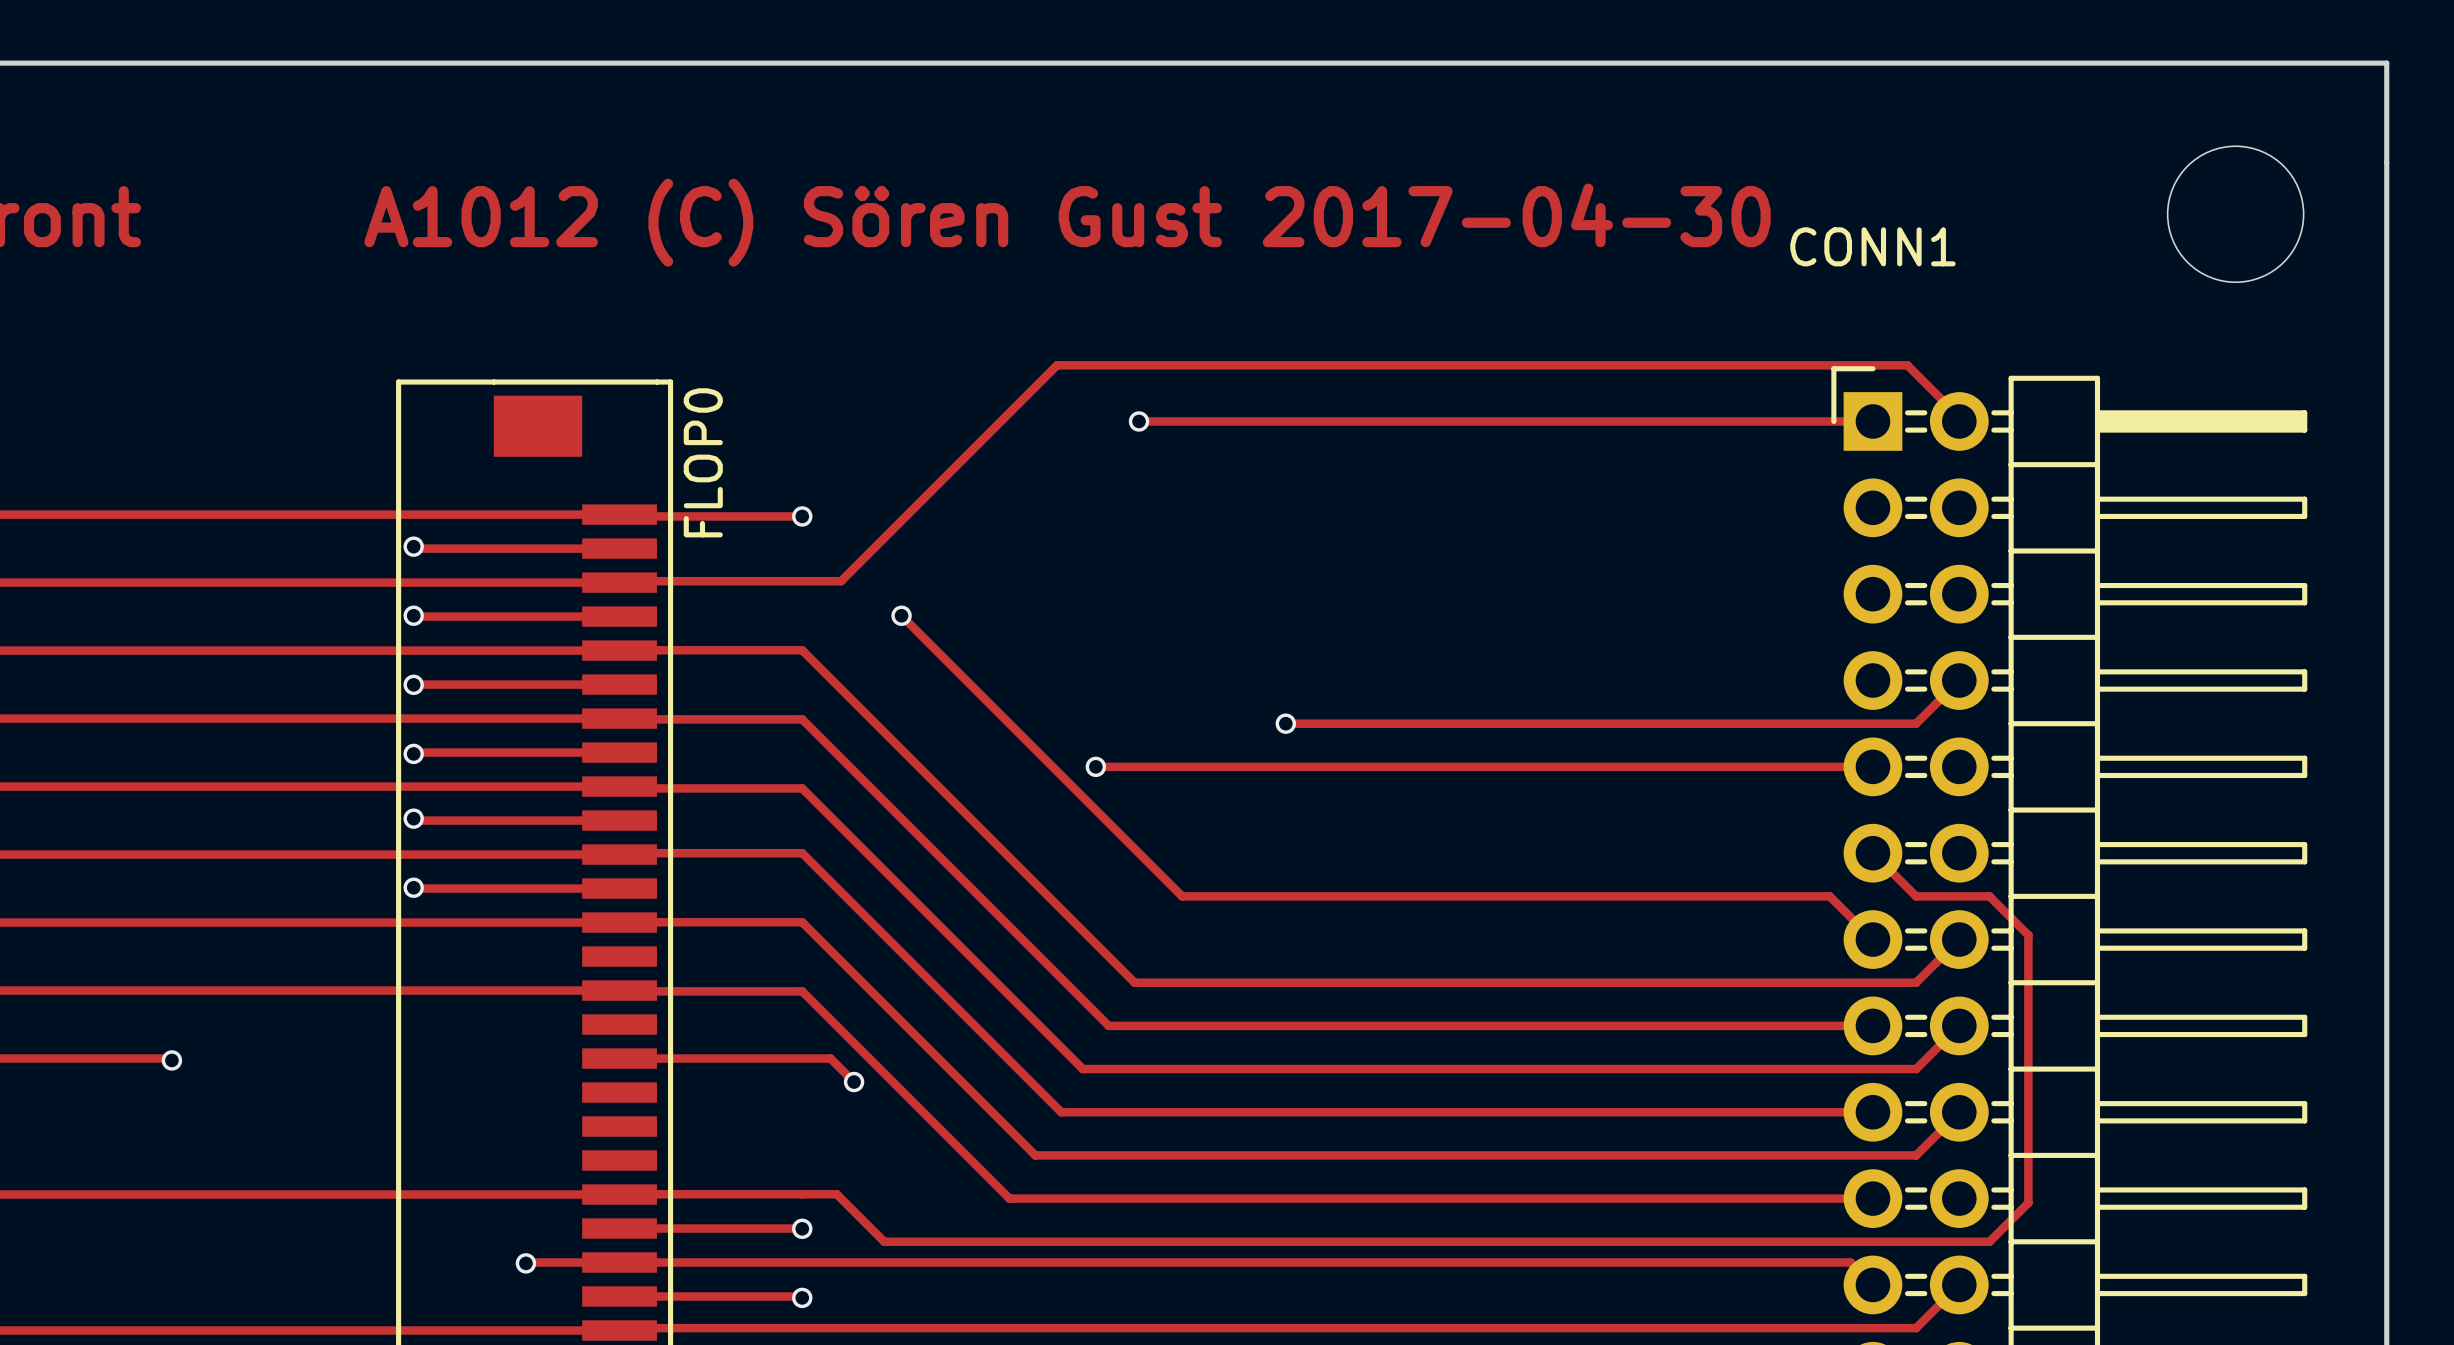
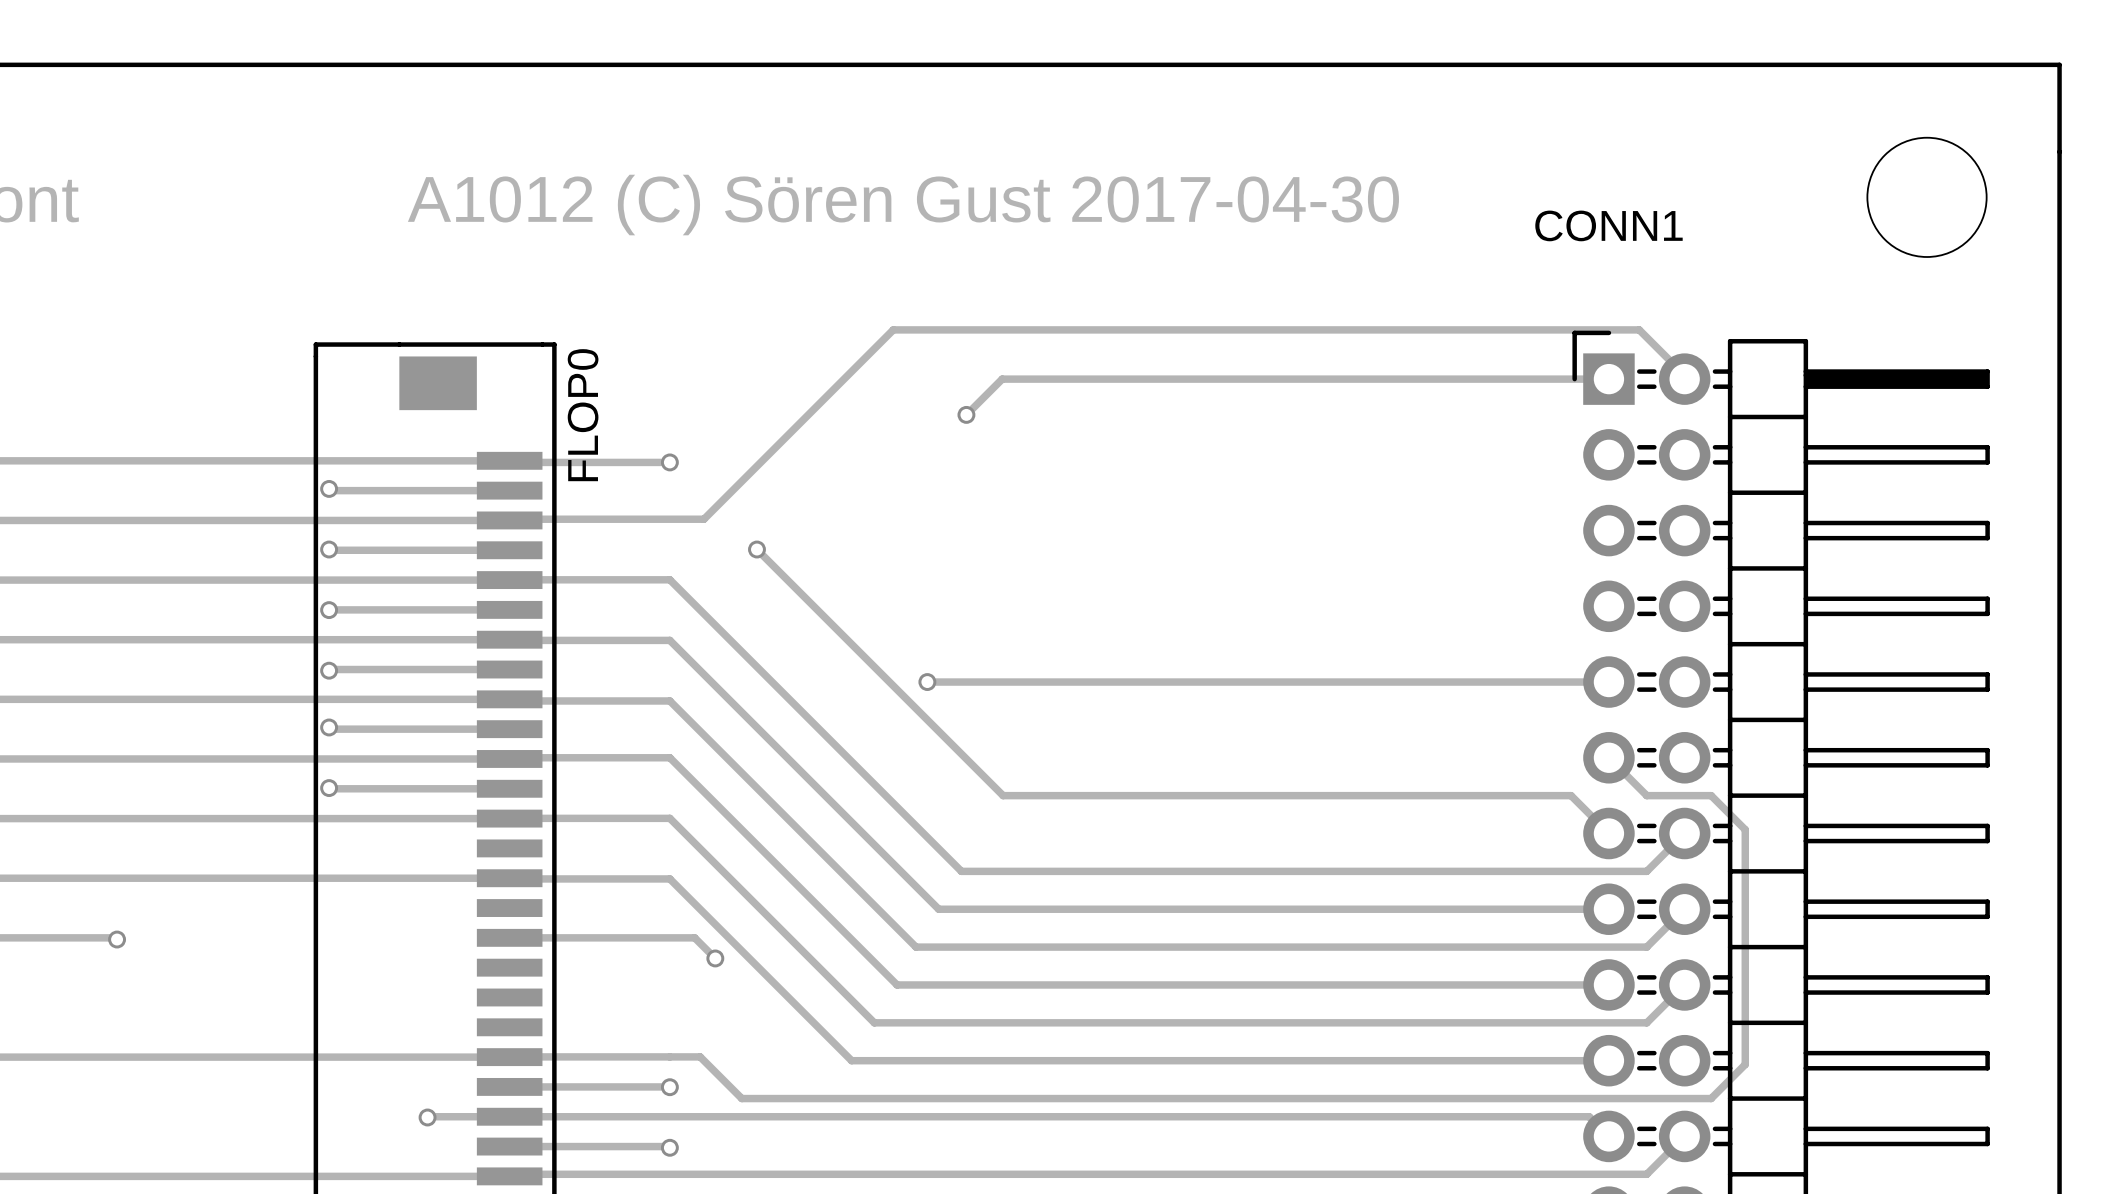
track: (1139, 421) (1181, 421) -> (966, 414) (1002, 379)
via position: (1139, 421) -> (966, 414)
track: (1959, 680) (1916, 723) (1285, 723) -> none
via: (1285, 723) -> none

